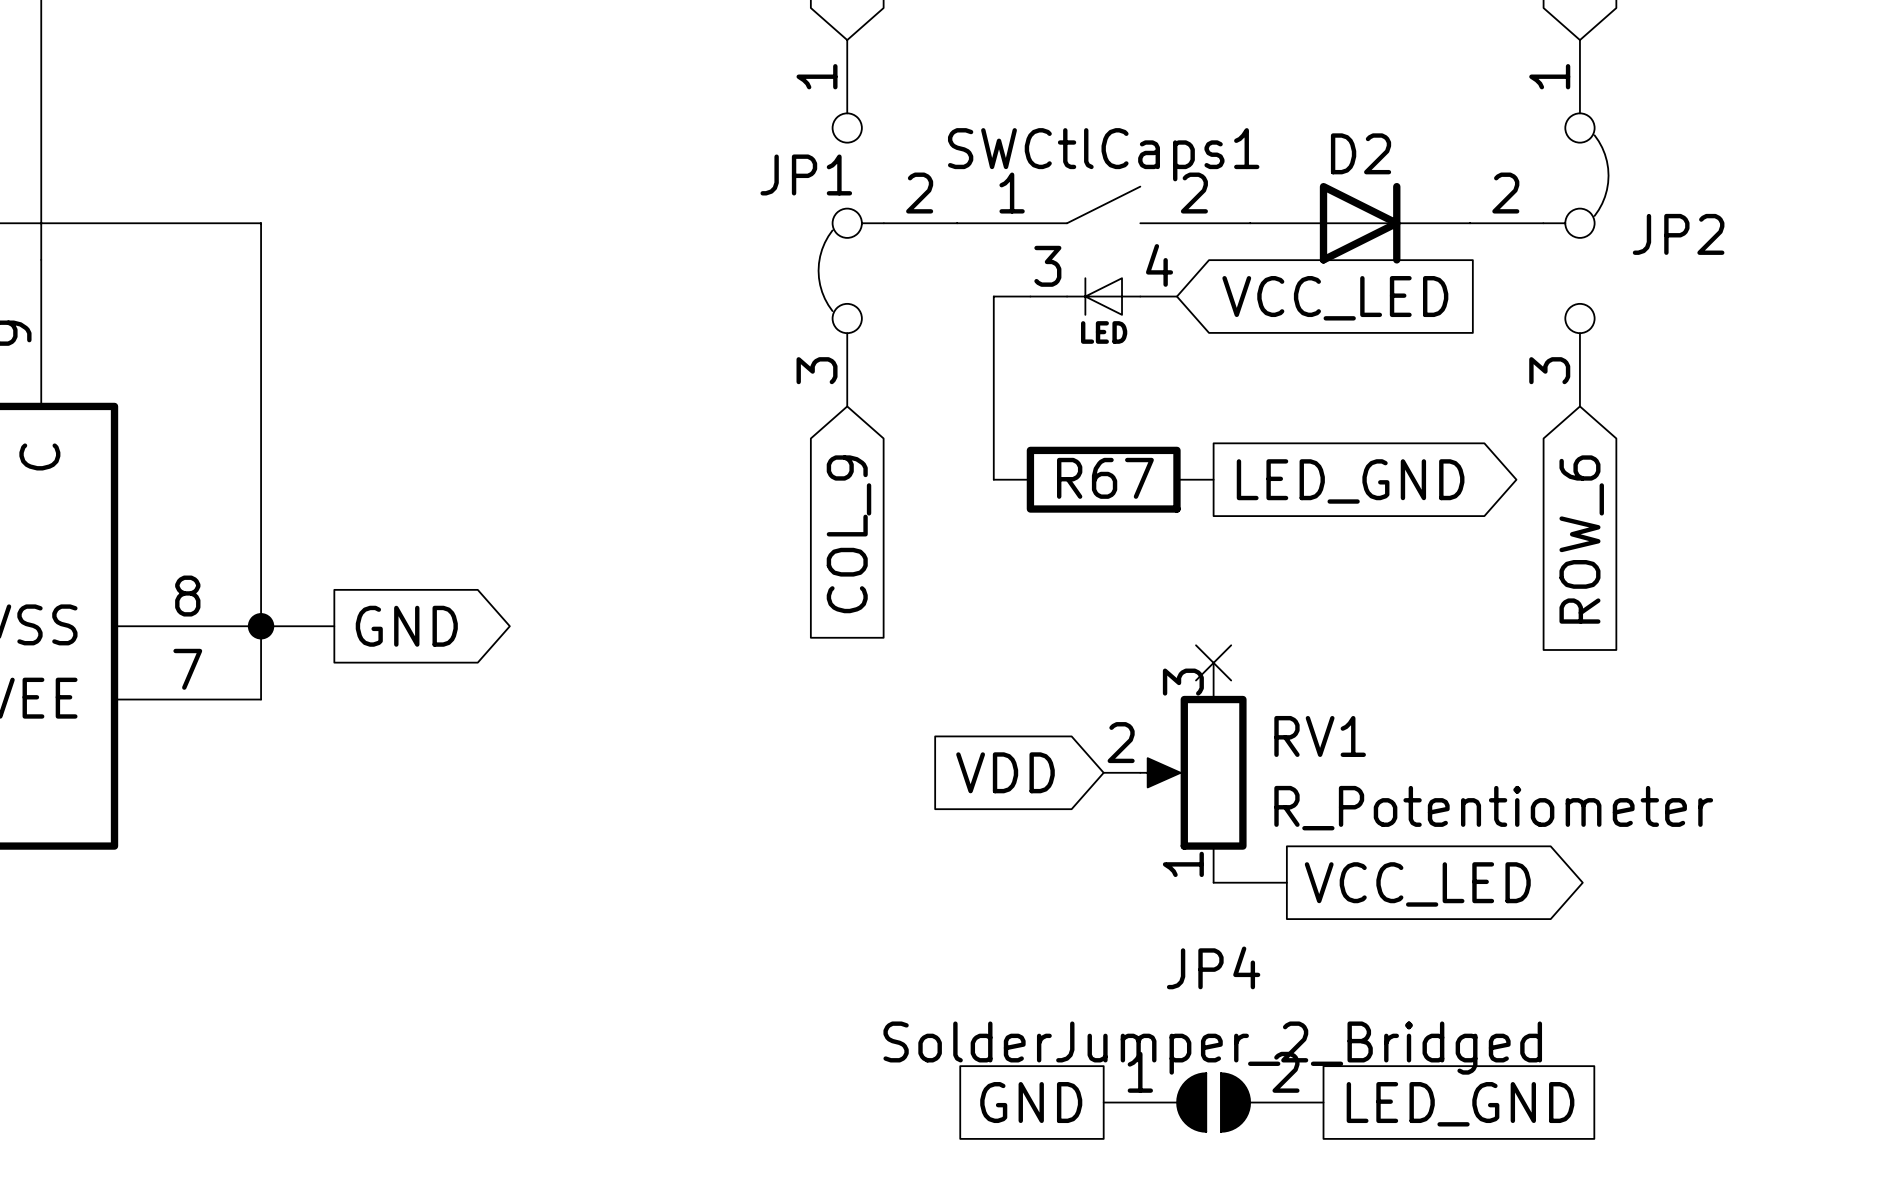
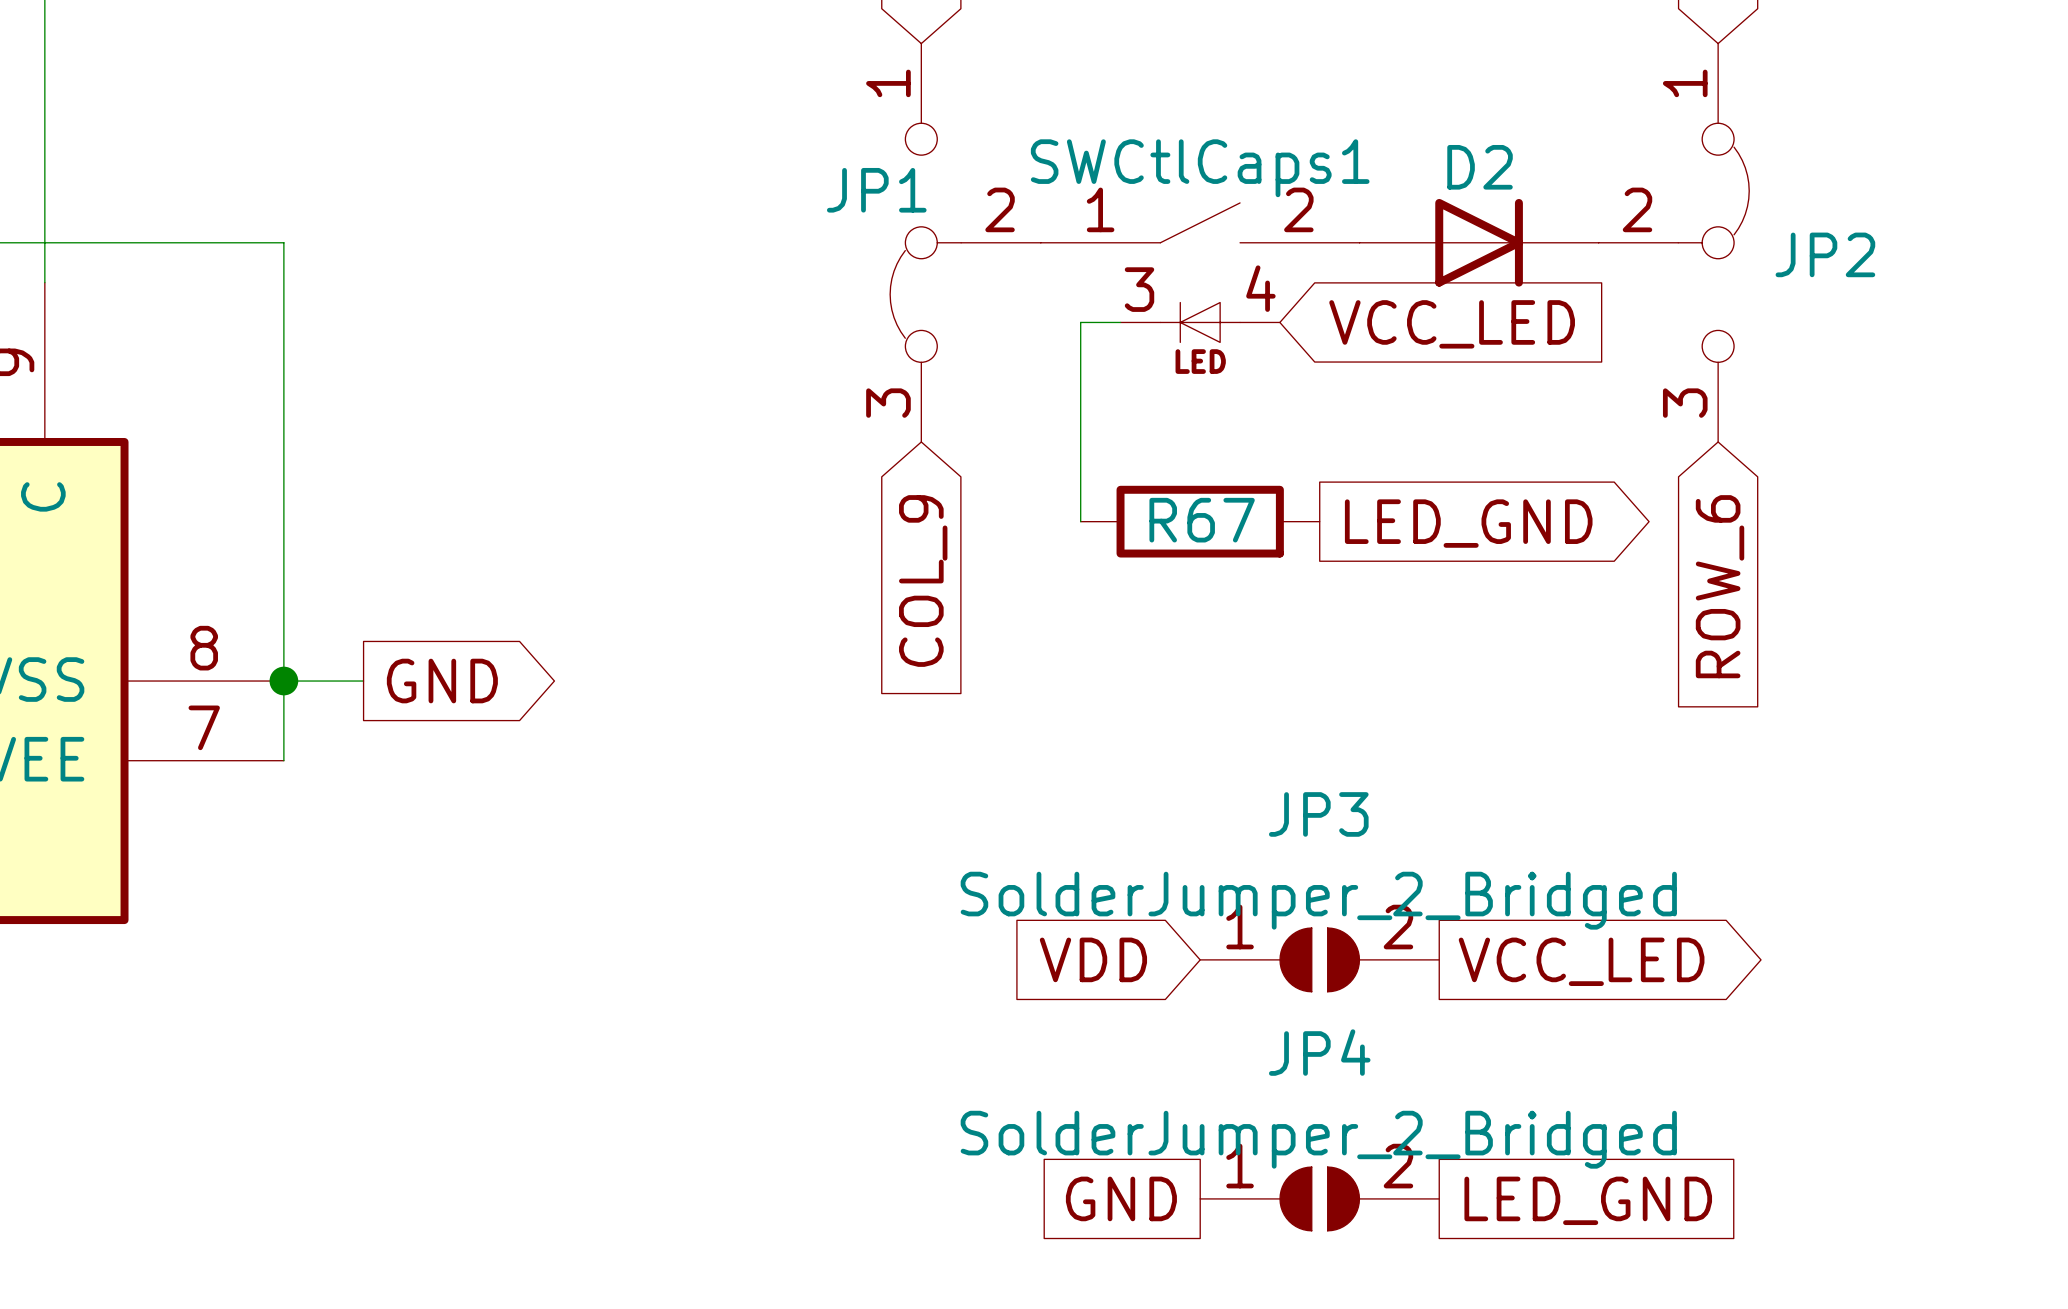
no-connect mark: (1213, 662) -> none
global label position: VDD (1005, 772) -> VDD (1093, 959)
RV1: R_Potentiometer (1175, 772) -> none
JP3: none -> SolderJumper_2_Bridged (1319, 959)
global label position: VCC_LED (1417, 884) -> VCC_LED (1581, 961)

